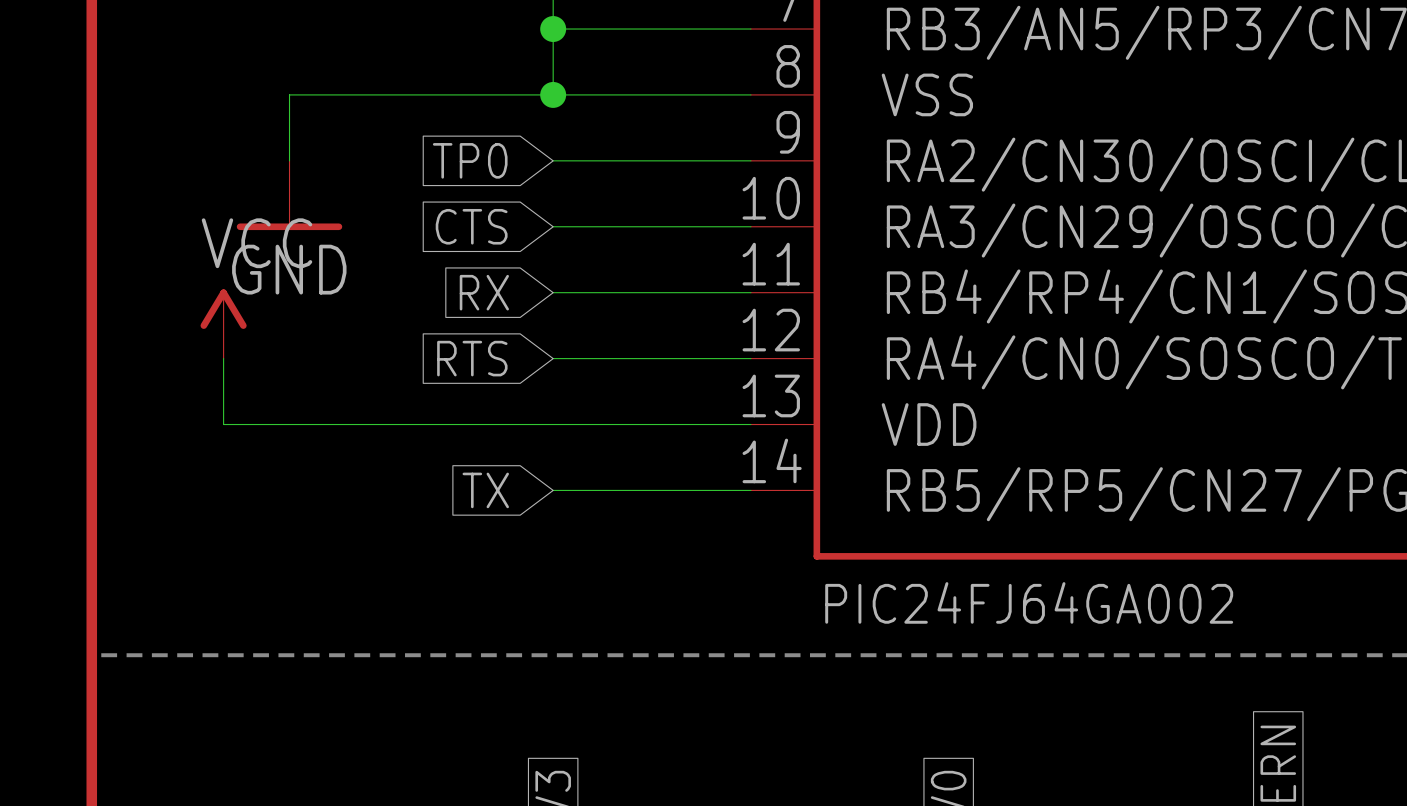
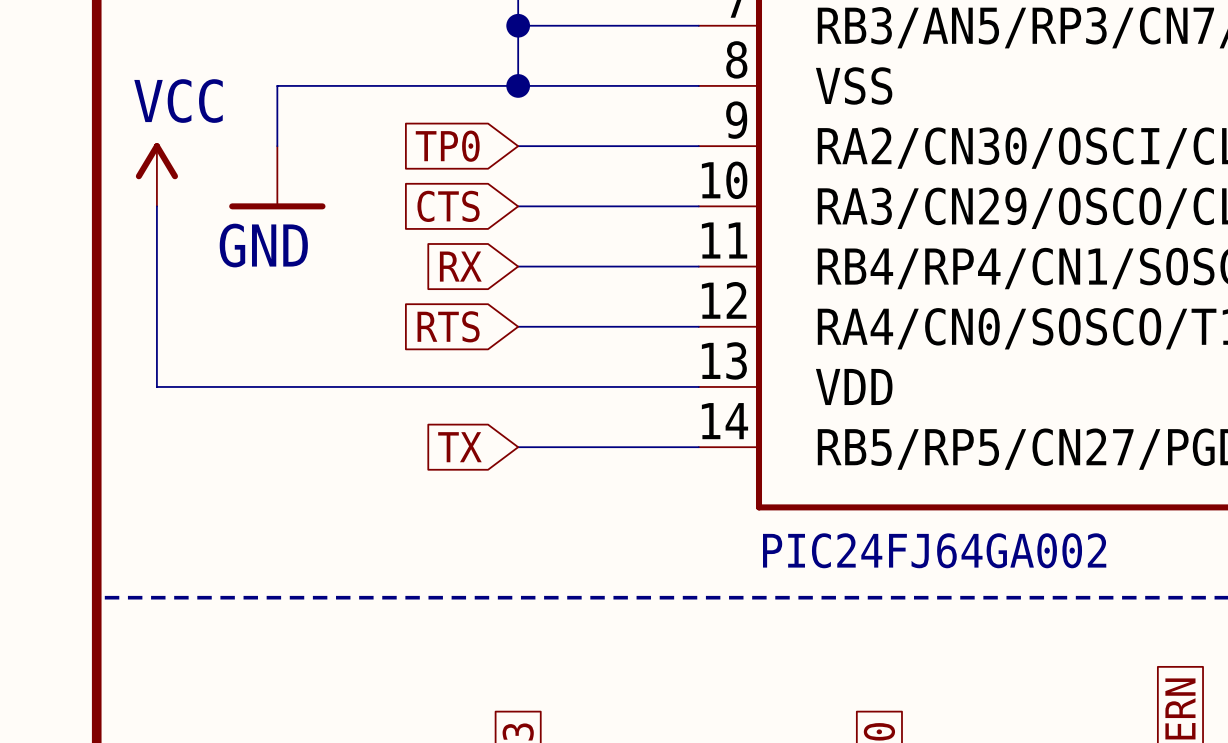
power symbol position: VCC (223, 323) -> VCC (156, 174)
wire: (223, 358) (223, 424) -> (156, 206) (156, 386) (217, 386)

